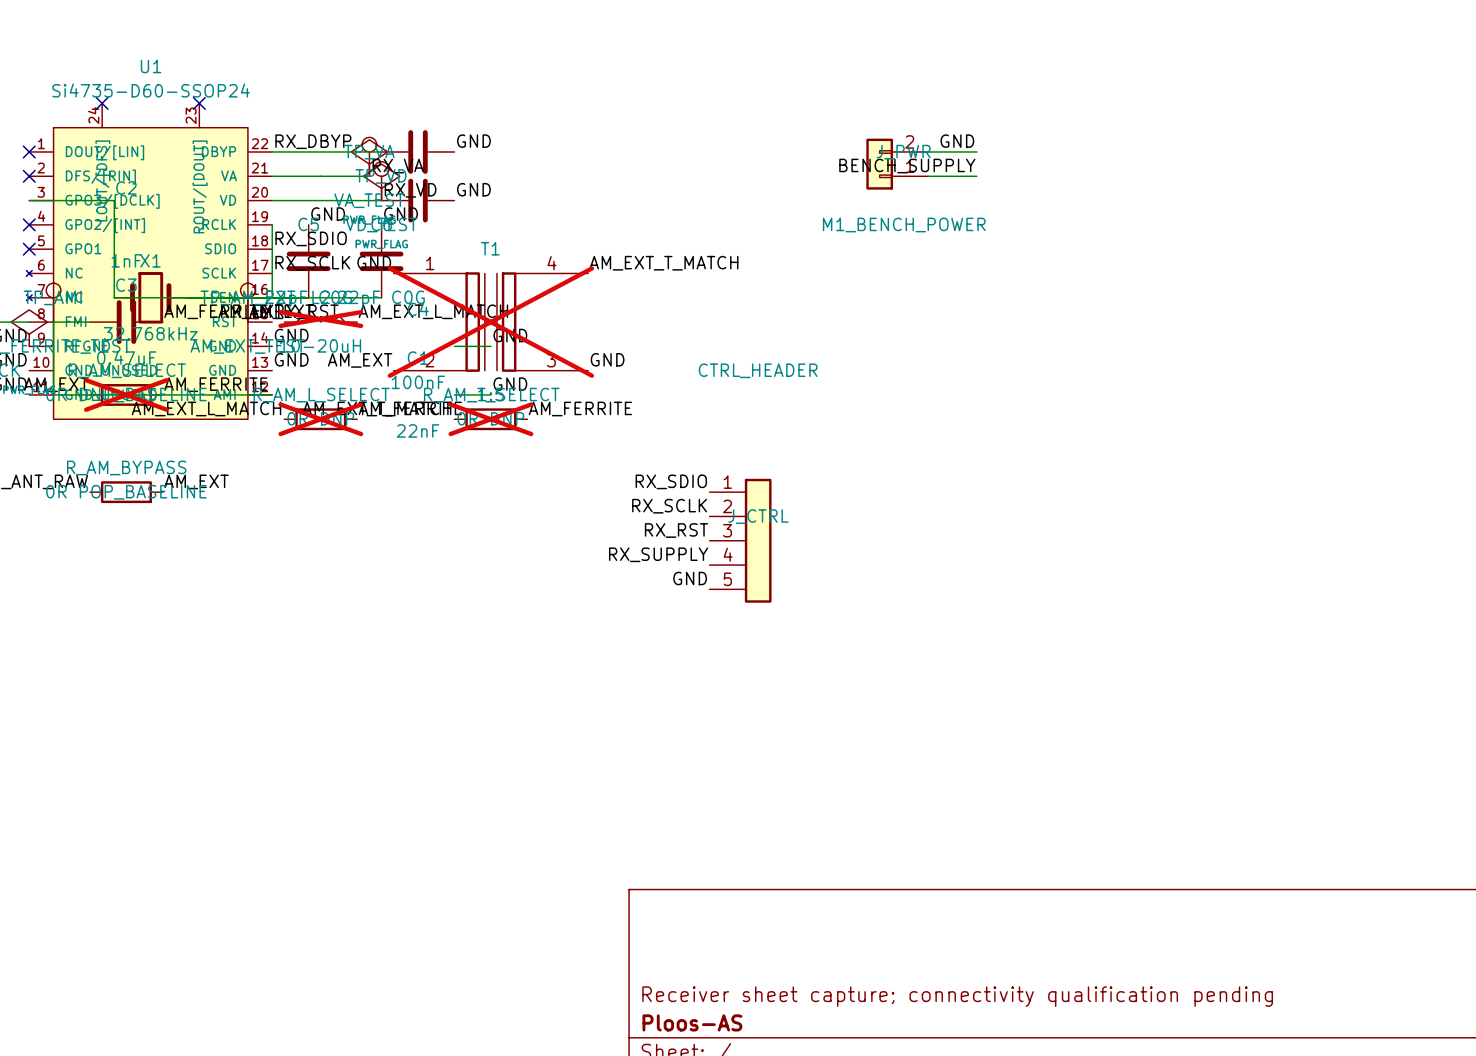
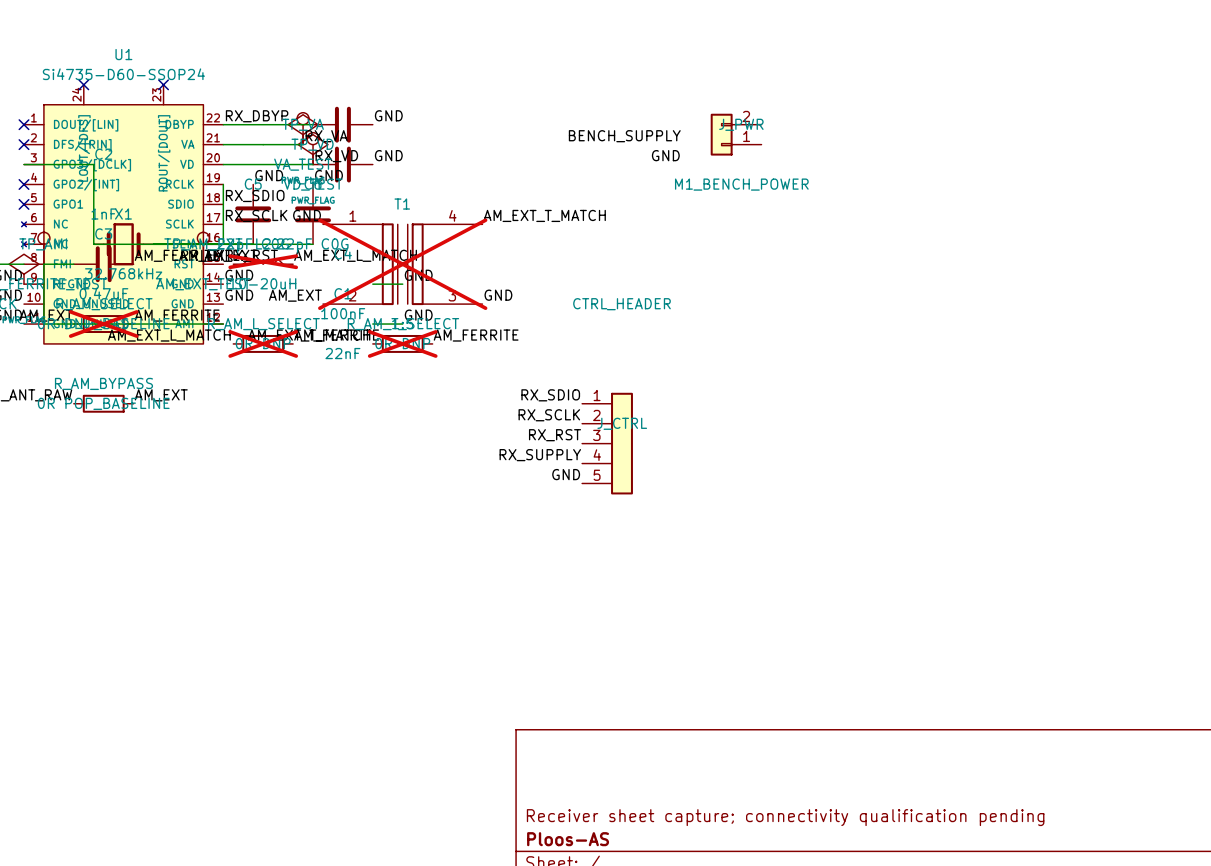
label position: GND (957, 141) -> GND (665, 155)
wire: (928, 151) (976, 151) -> none
label position: BENCH_SUPPLY (907, 166) -> BENCH_SUPPLY (624, 136)
wire: (928, 176) (976, 176) -> none

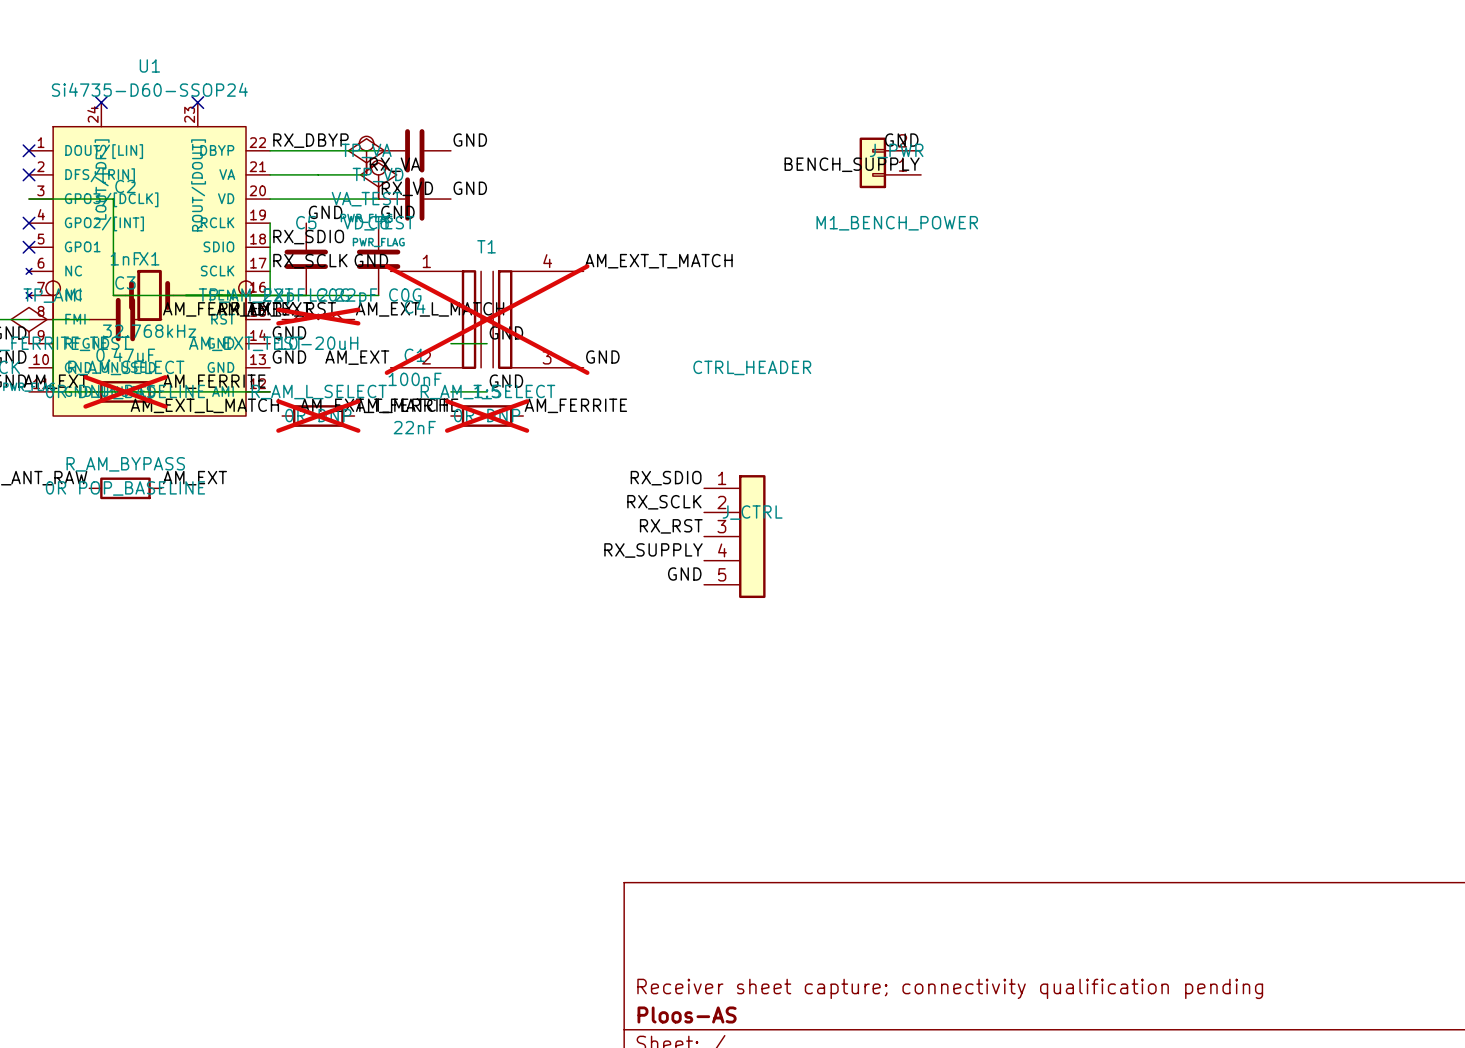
label position: BENCH_SUPPLY (624, 136) -> BENCH_SUPPLY (852, 164)
label position: GND (665, 155) -> GND (901, 140)

